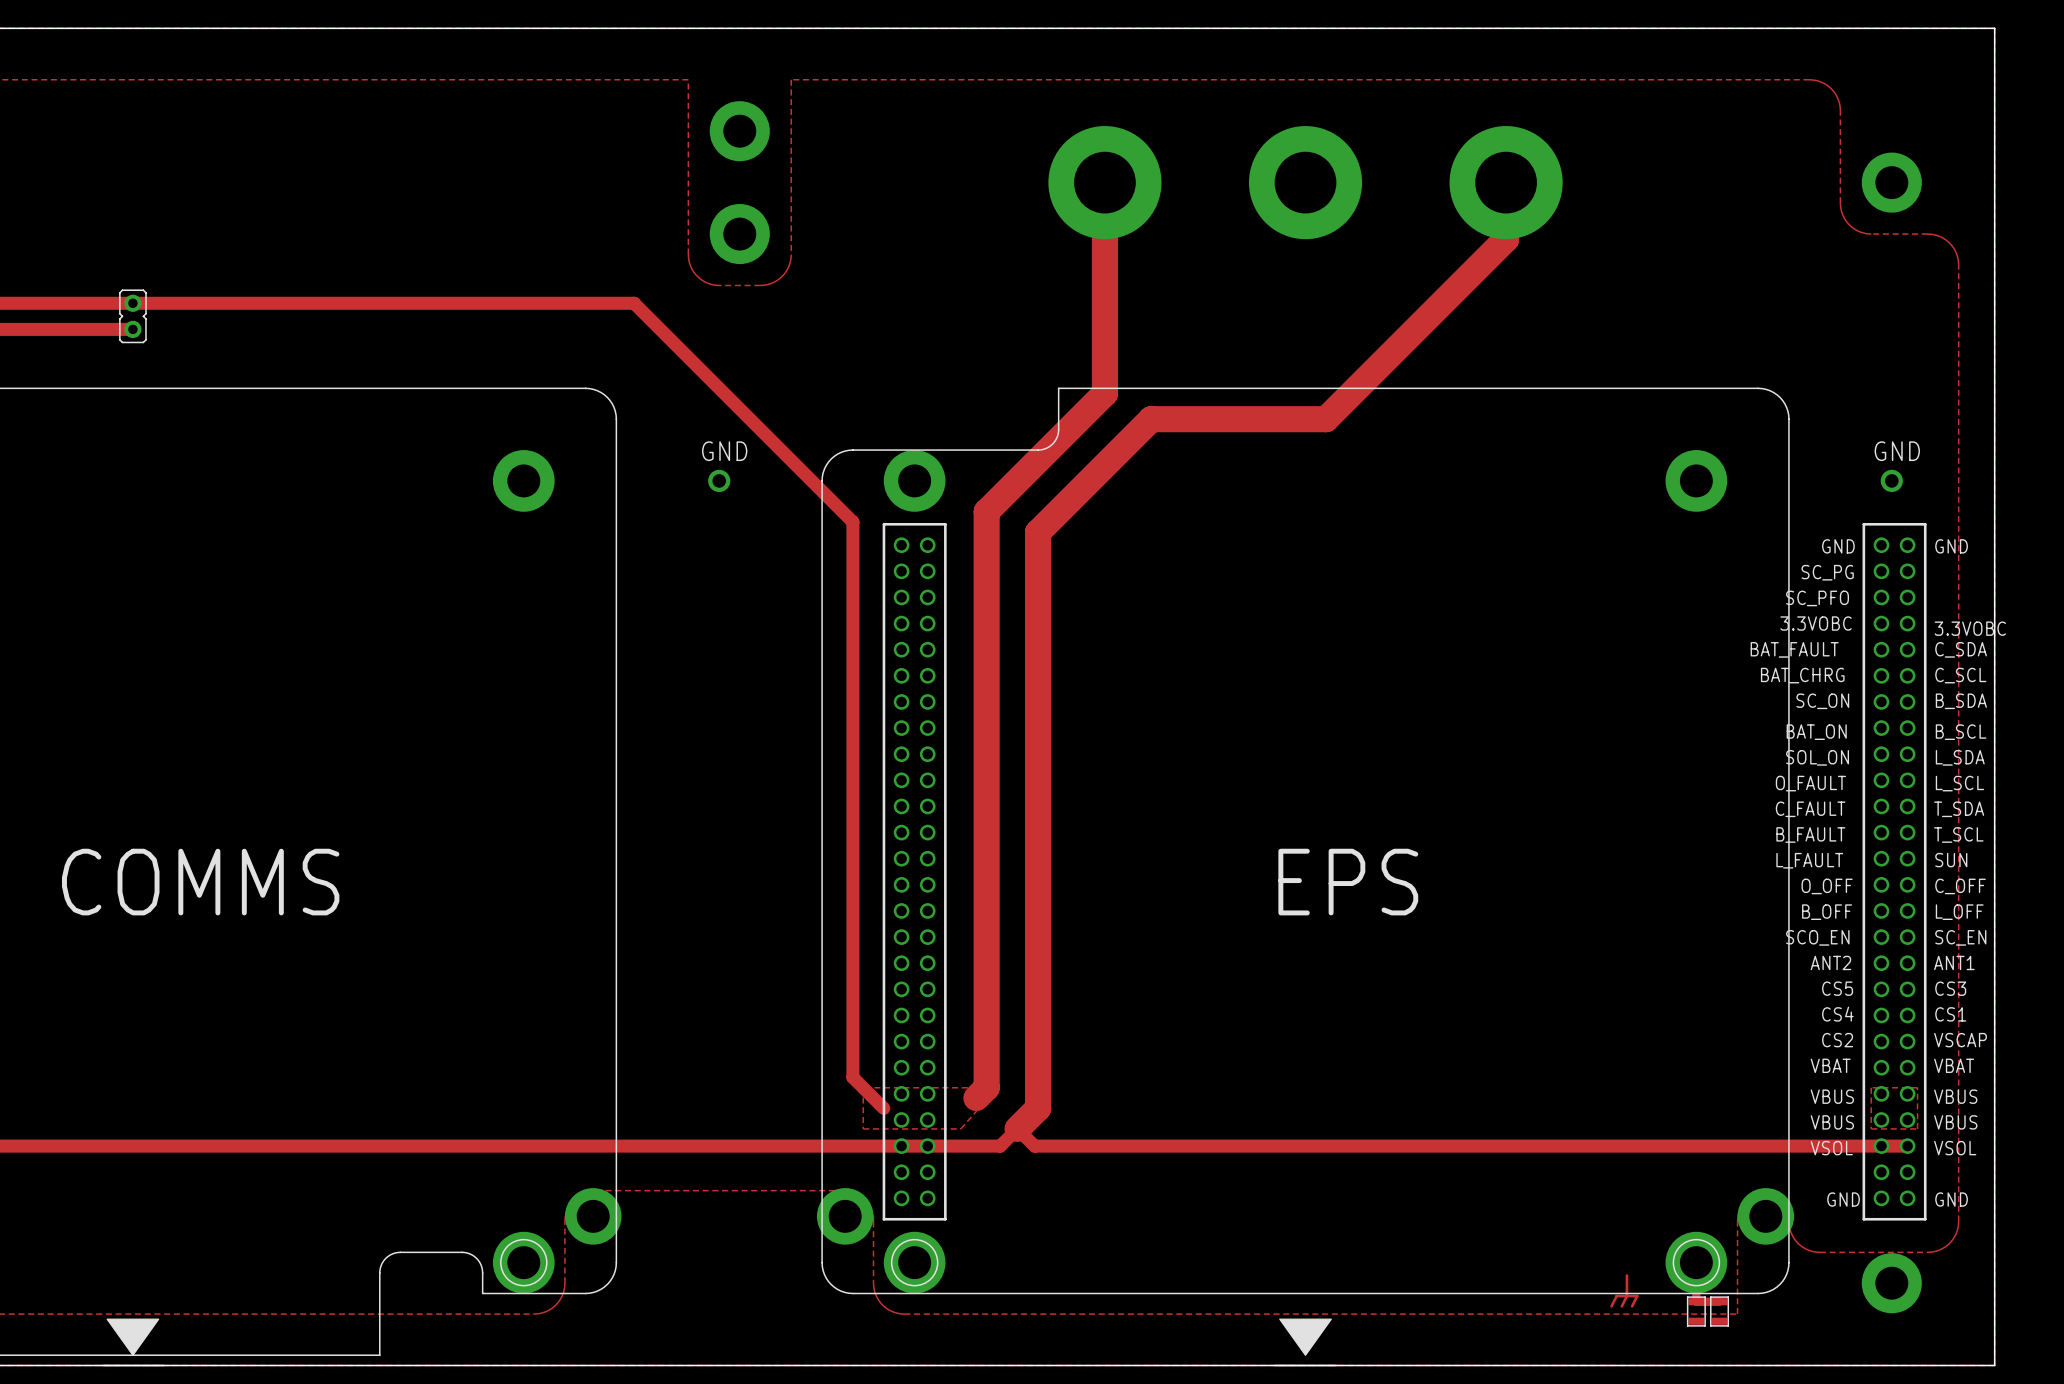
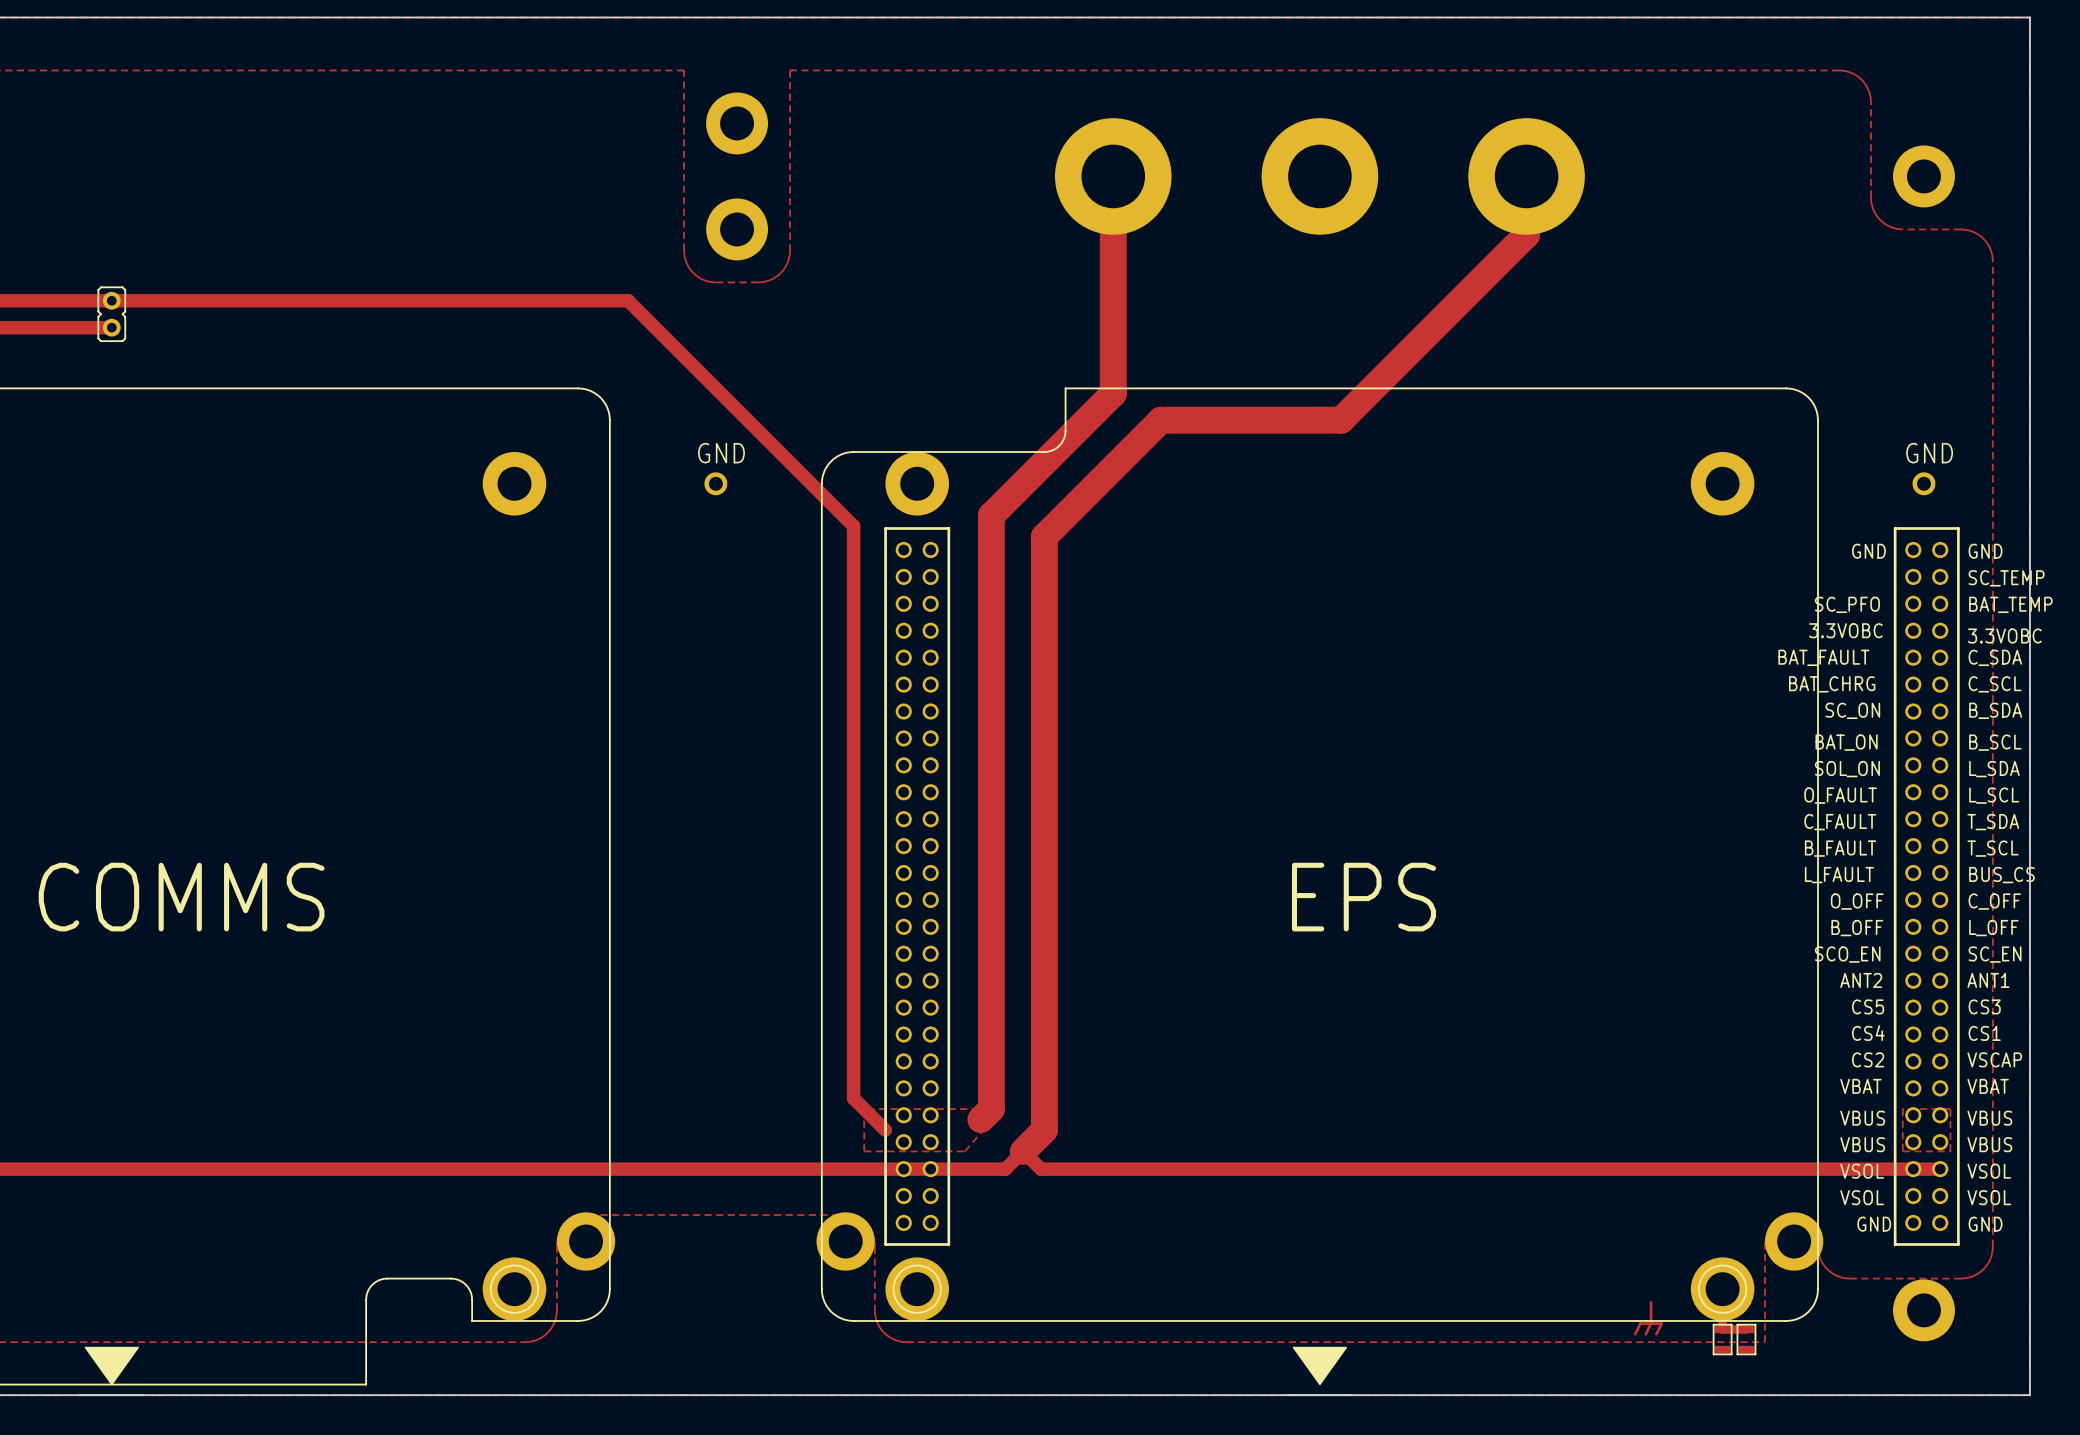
text: SC_PG (1827, 572) -> none
text: none -> SC_TEMP (2006, 578)
text: none -> BAT_TEMP (2010, 604)
text: SUN (1951, 860) -> BUS_CS (2001, 875)
text: none -> VSOL (1862, 1197)
text: none -> VSOL (1989, 1197)

